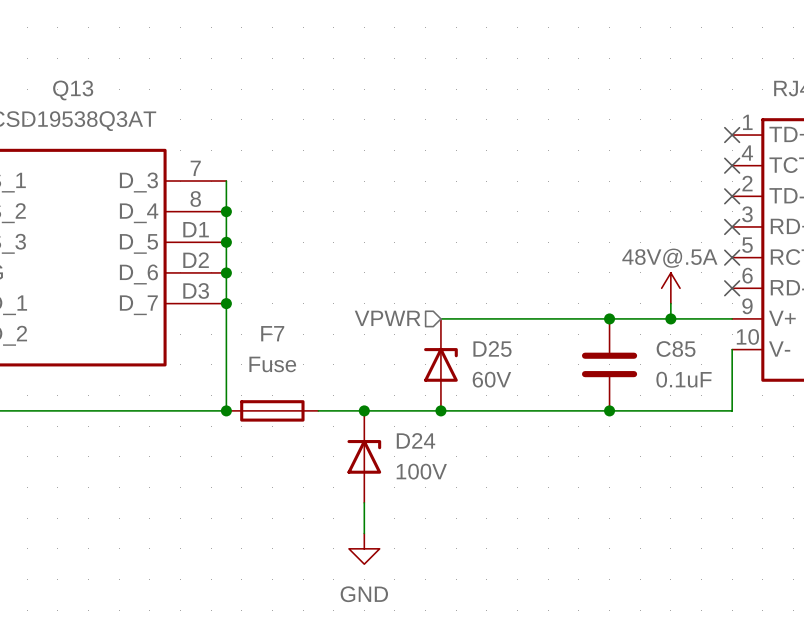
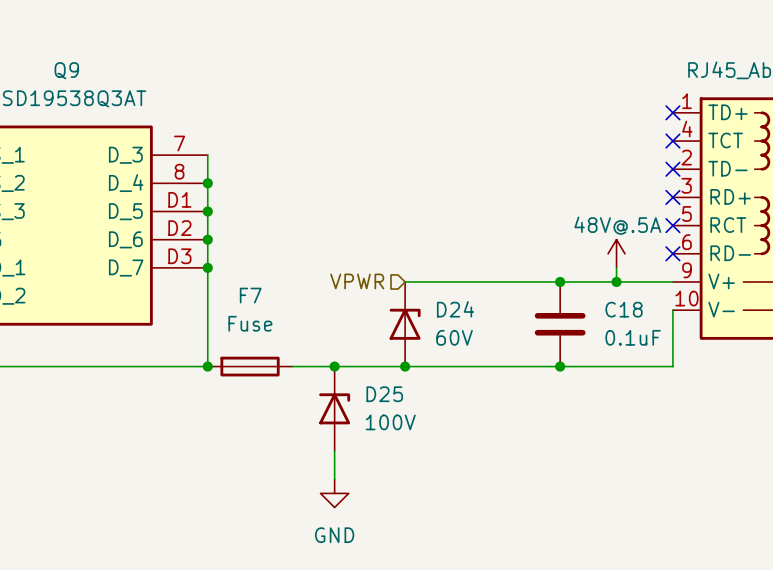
Q13 name: Q13 (73, 90) -> Q9 (66, 70)
D25 name: D25 (492, 349) -> D24 (455, 309)
C85 name: C85 (676, 349) -> C18 (624, 309)
D24 name: D24 (415, 440) -> D25 (384, 394)

